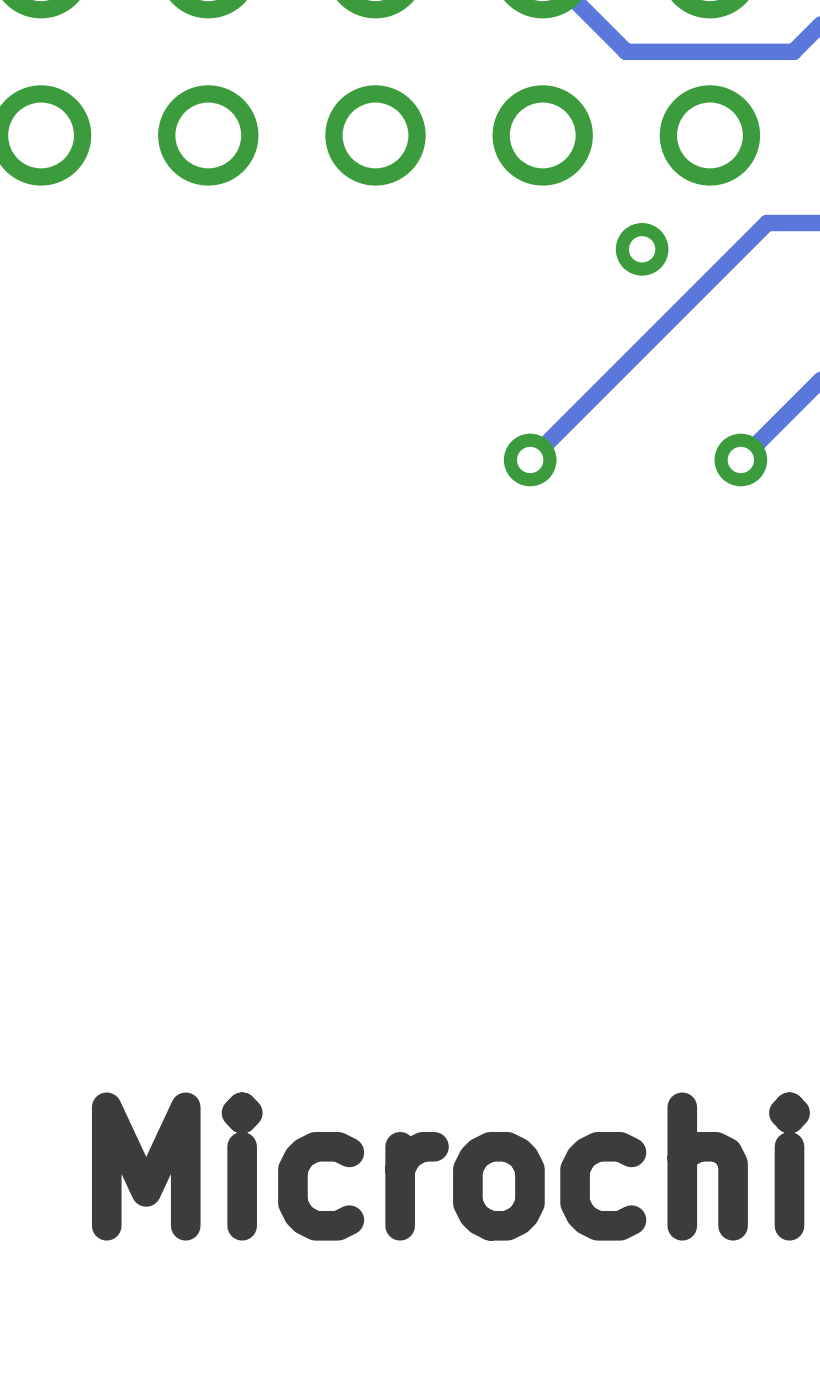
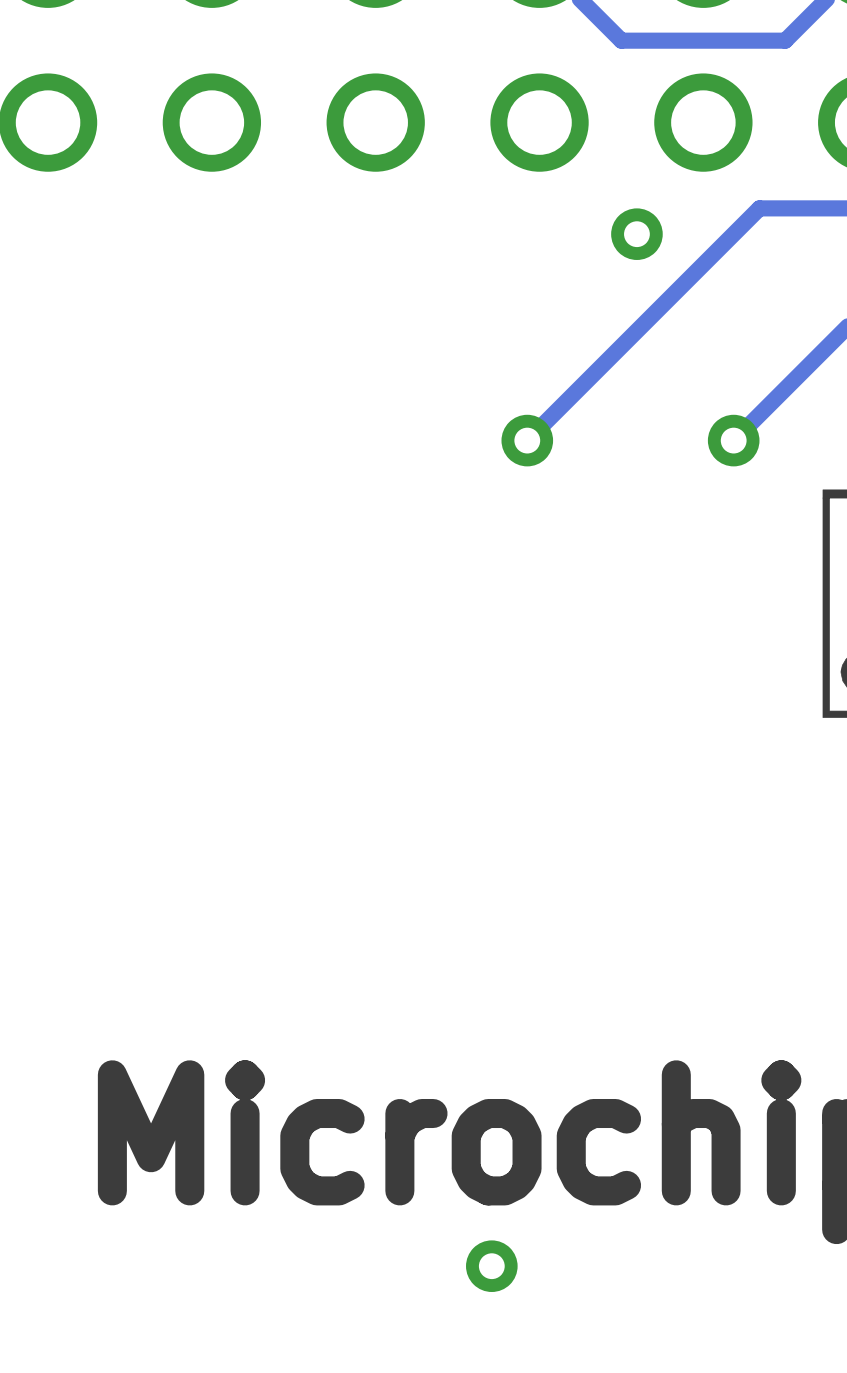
via: none -> (491, 1266)

